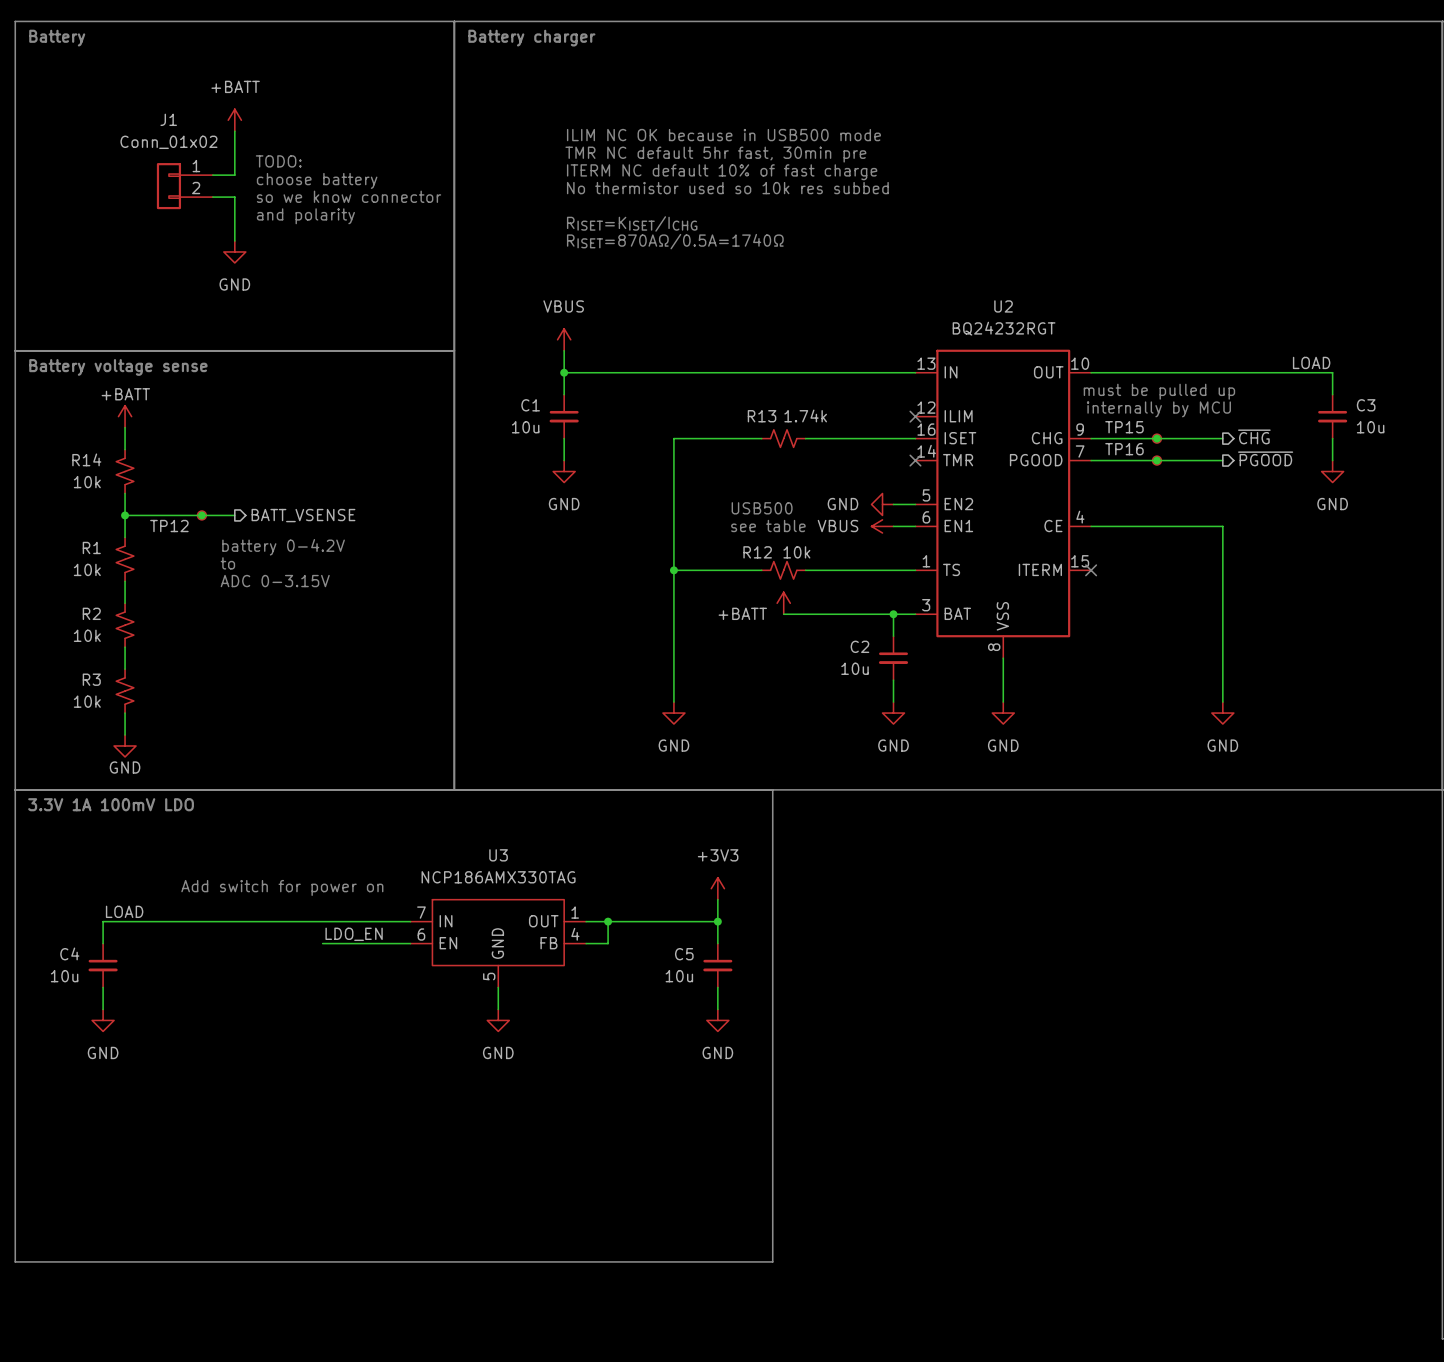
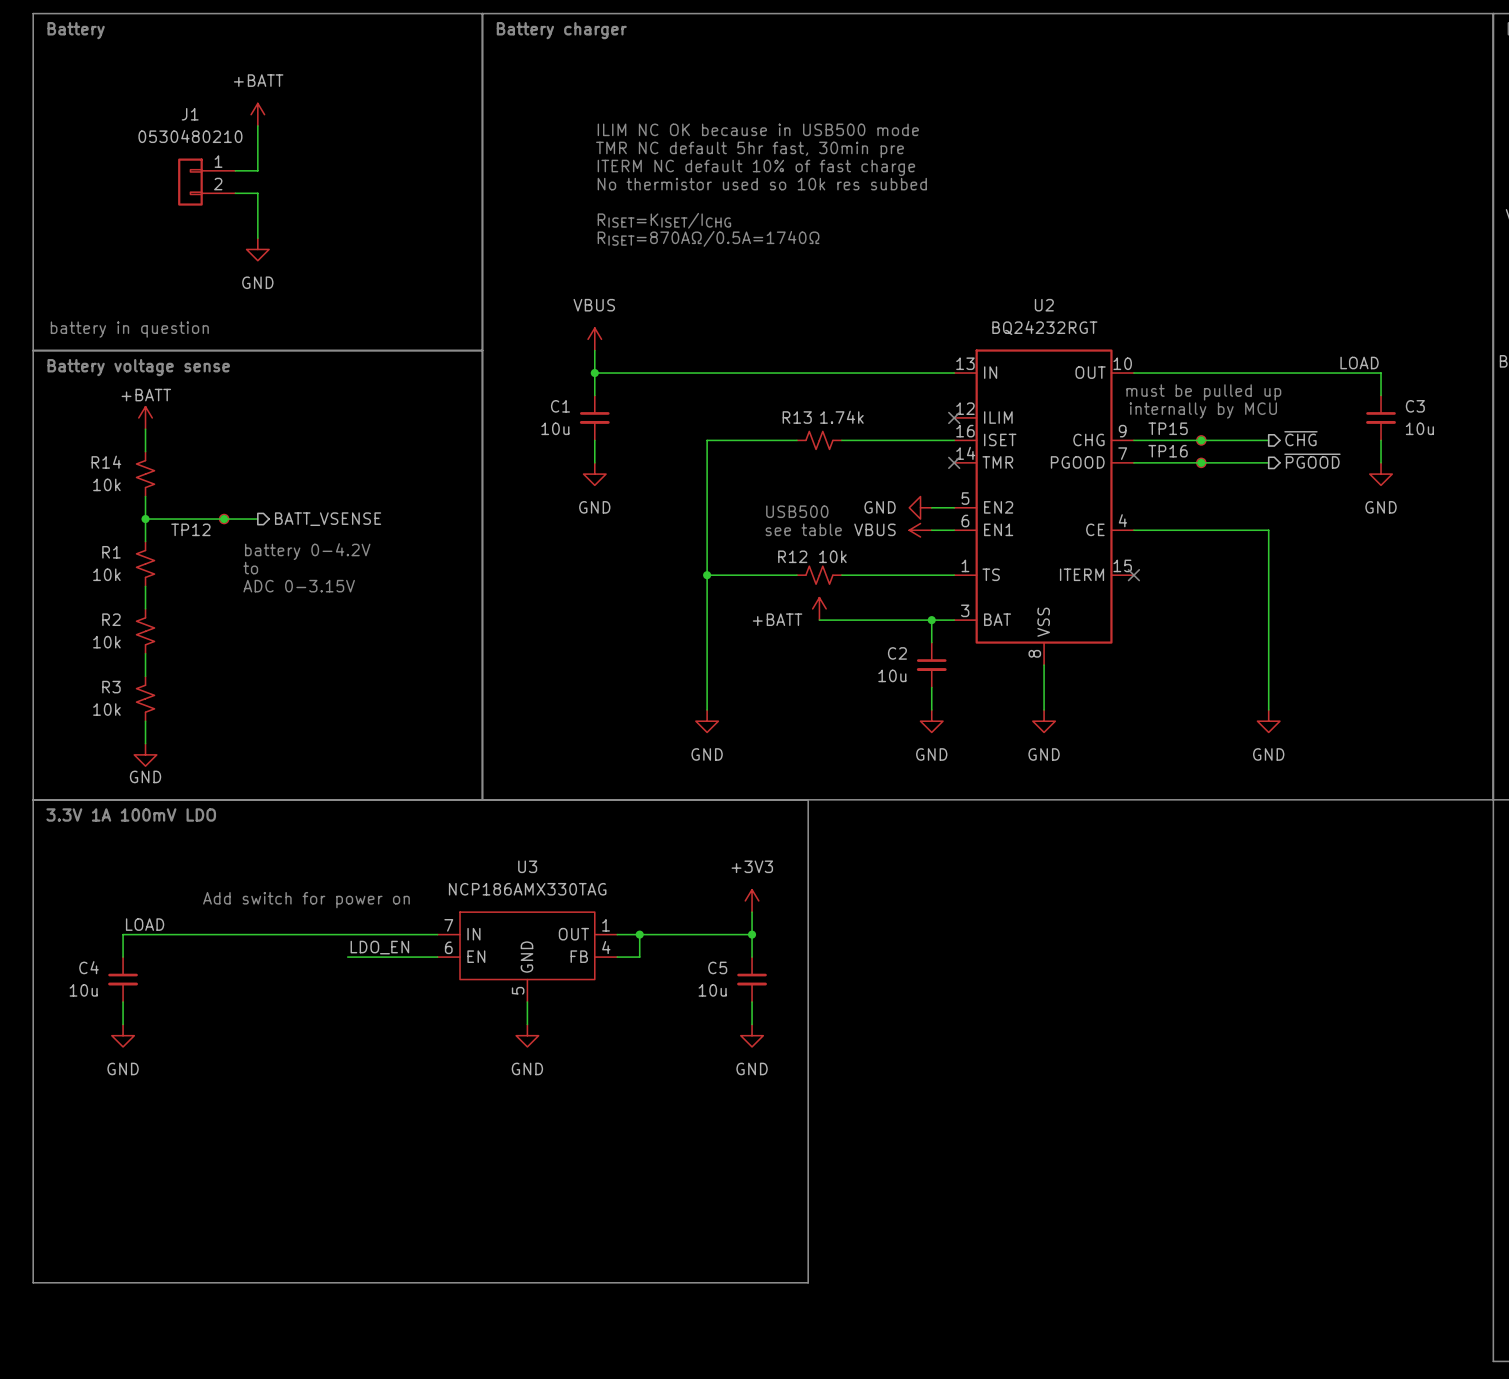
J1 value: Conn_01x02 (168, 142) -> 0530480210 (190, 136)
text: TODO: (278, 161) -> none
text: choose battery (317, 180) -> none
text: so we know connector (349, 196) -> none
text: and polarity (305, 216) -> none
text: none -> battery in question (129, 329)

